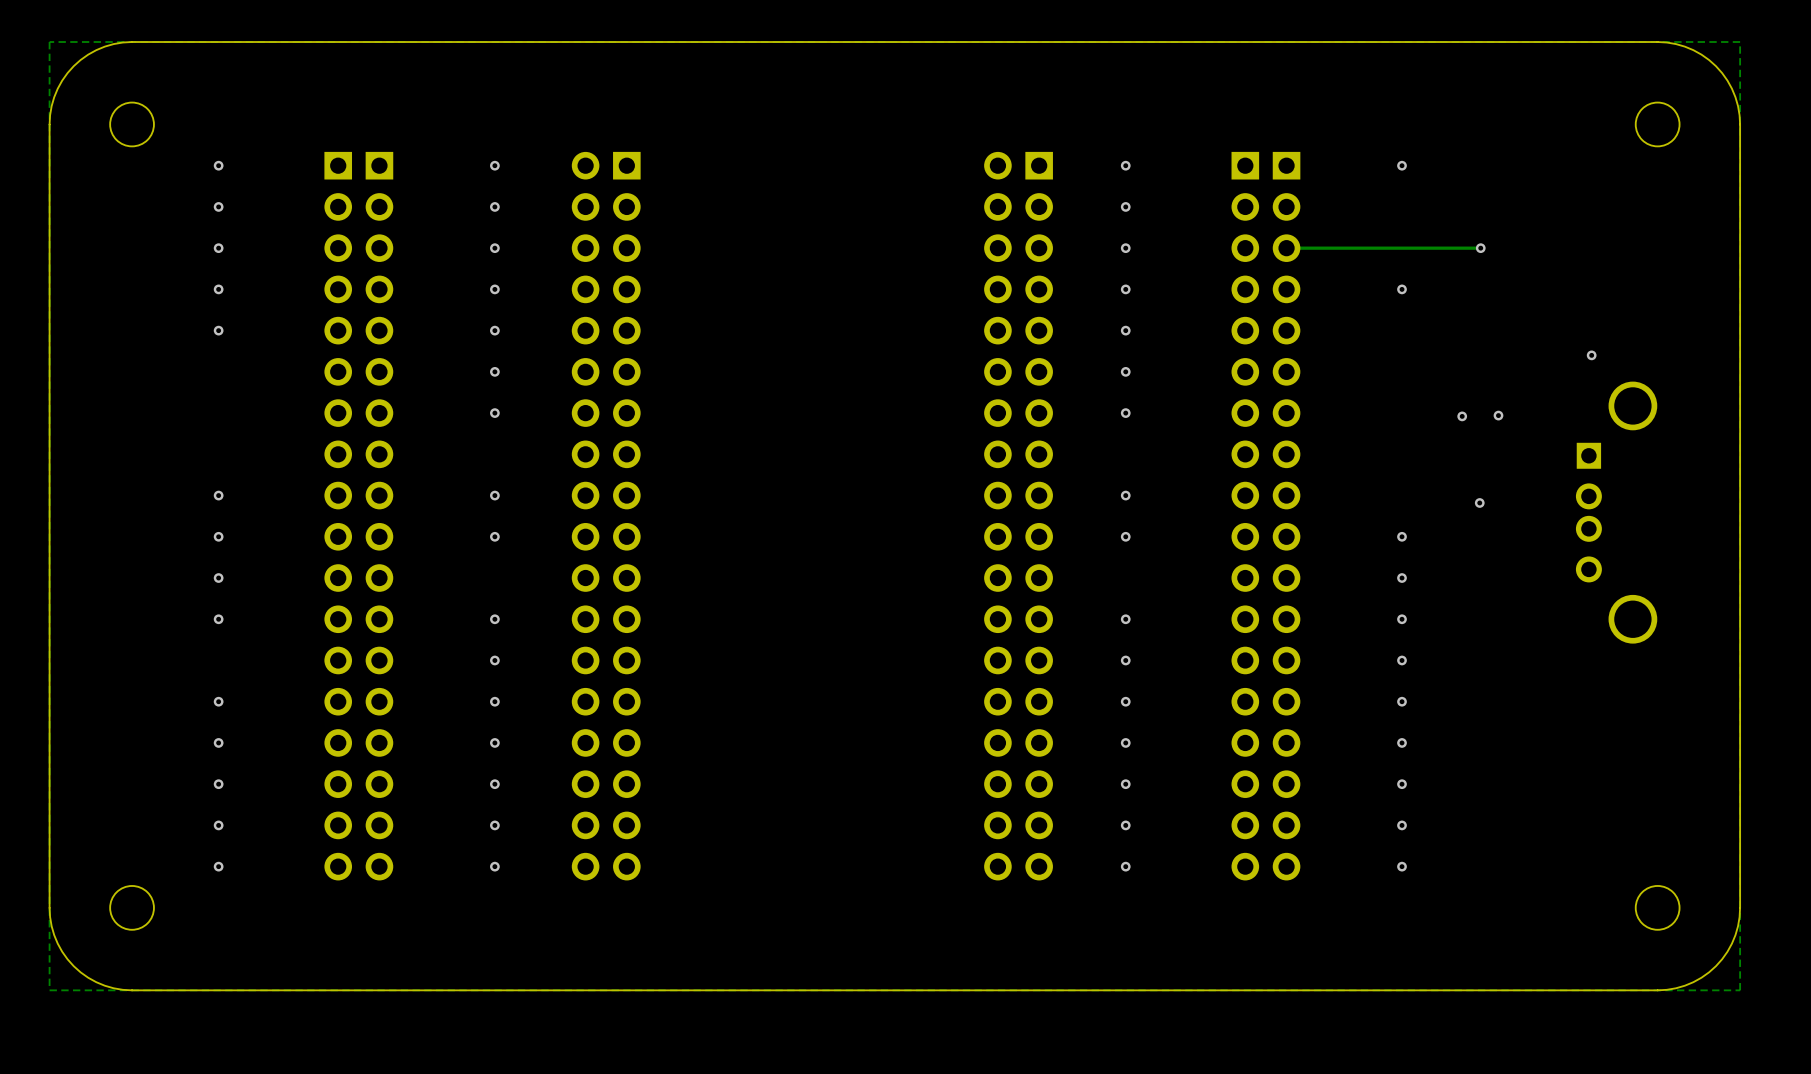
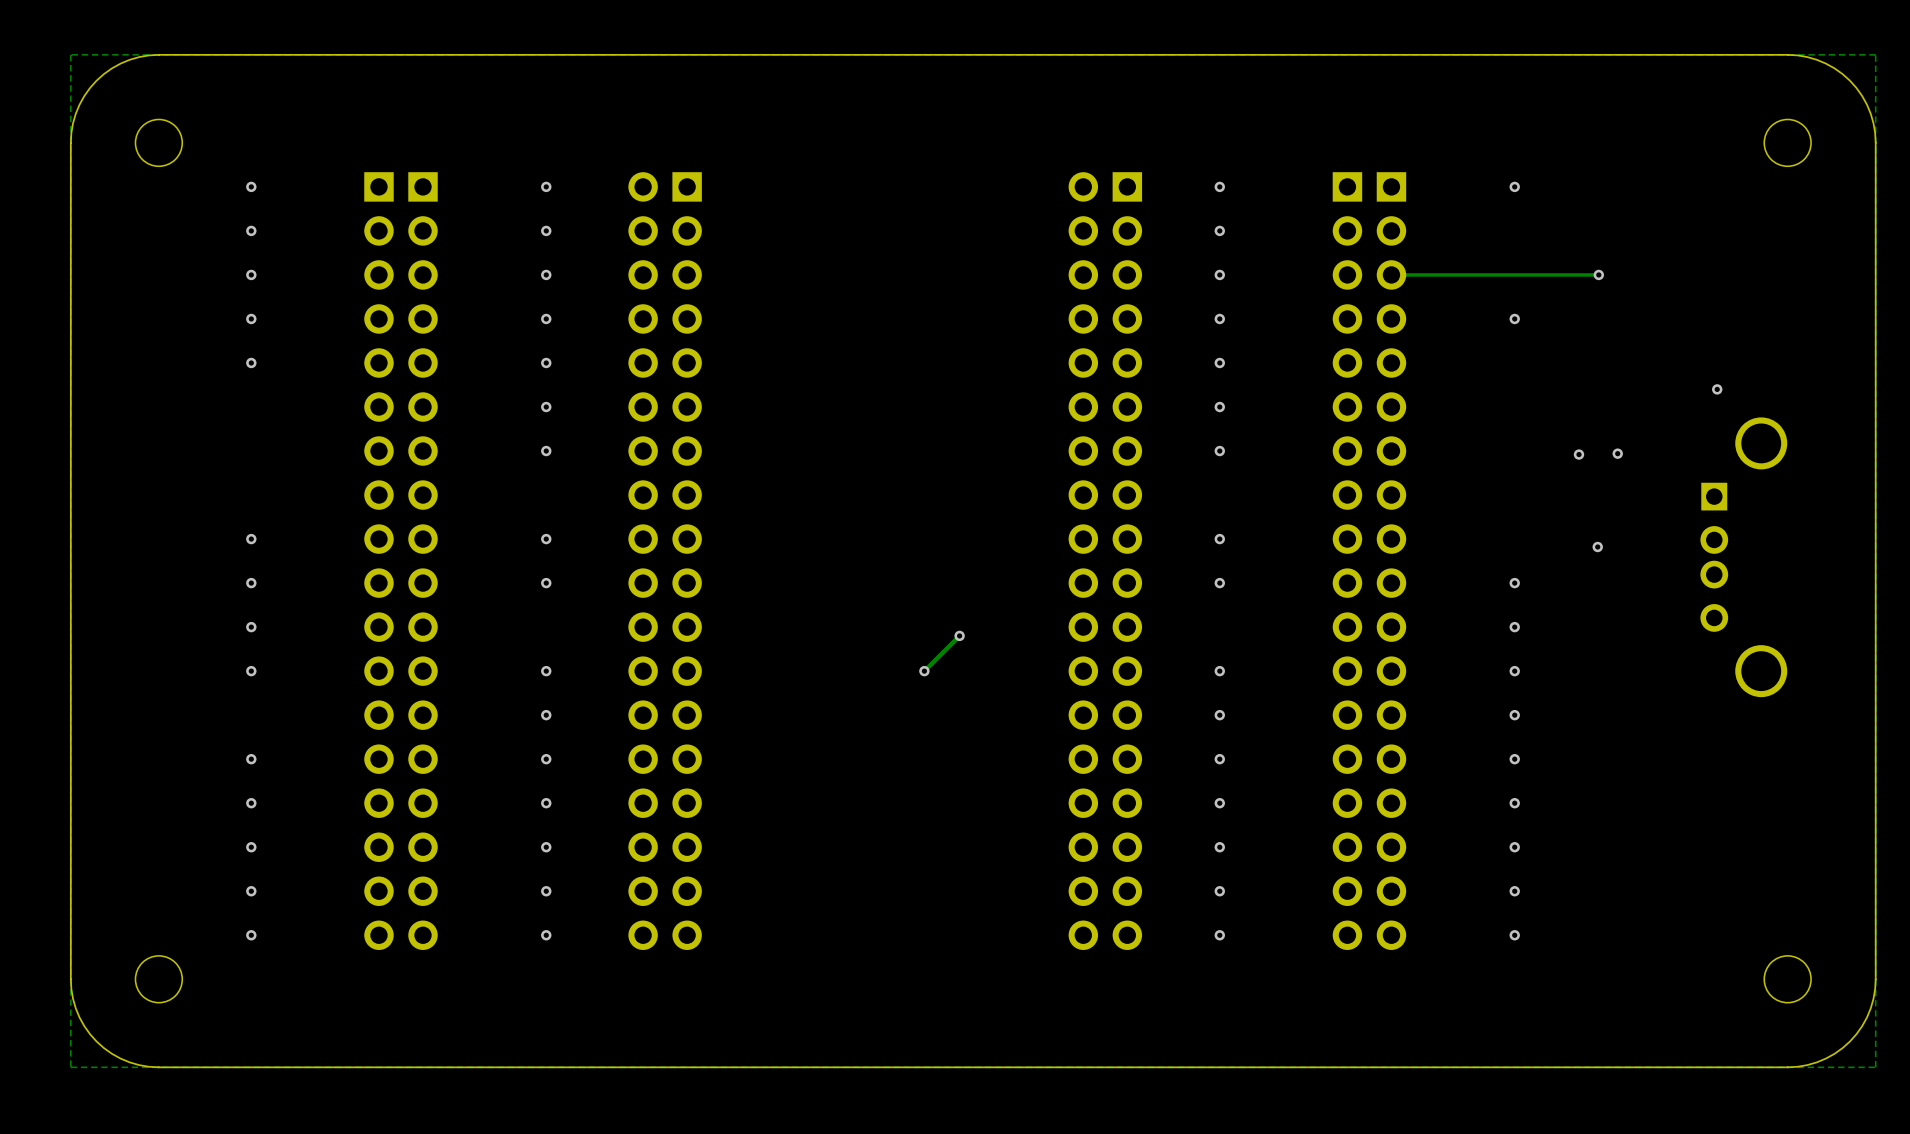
track: none -> (959, 635) (924, 671)
via: none -> (959, 635)
via: none -> (924, 671)

